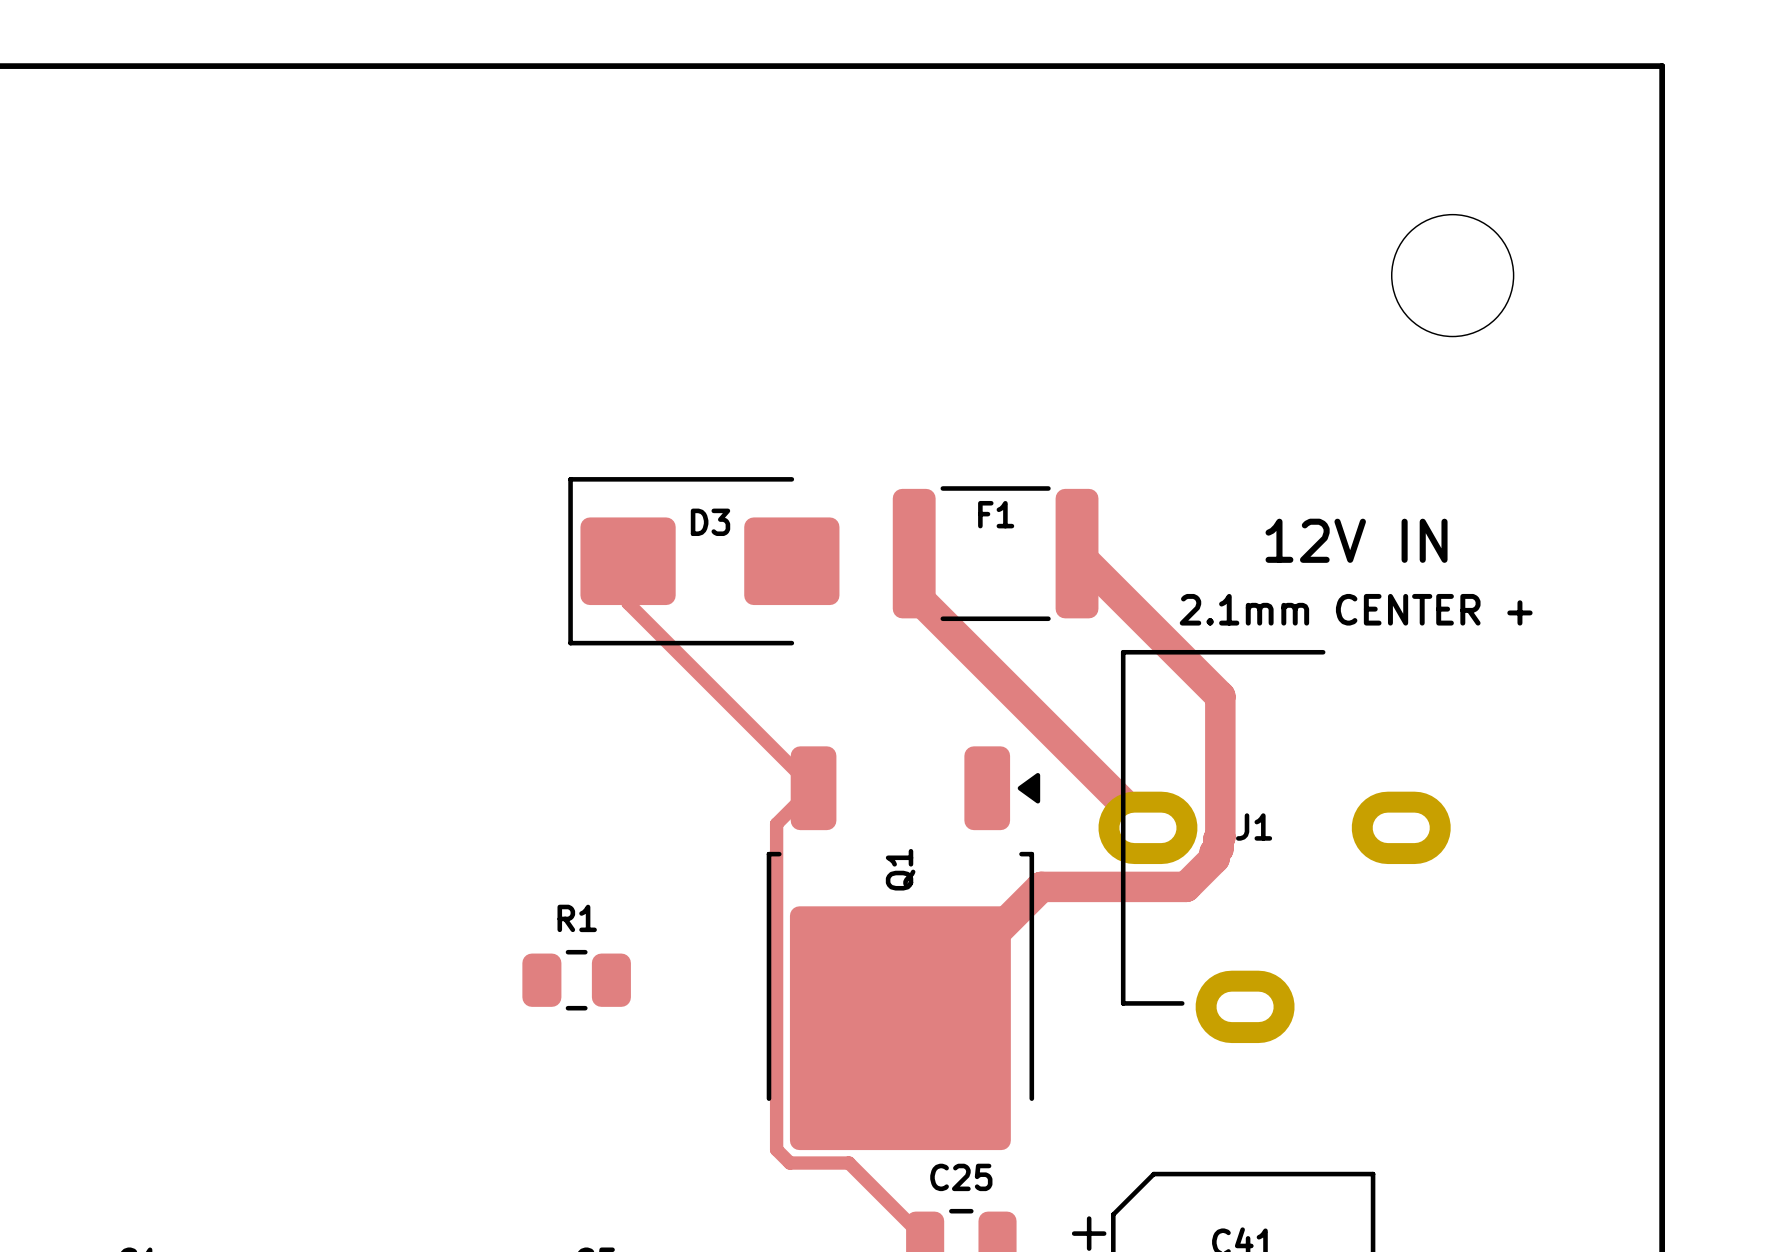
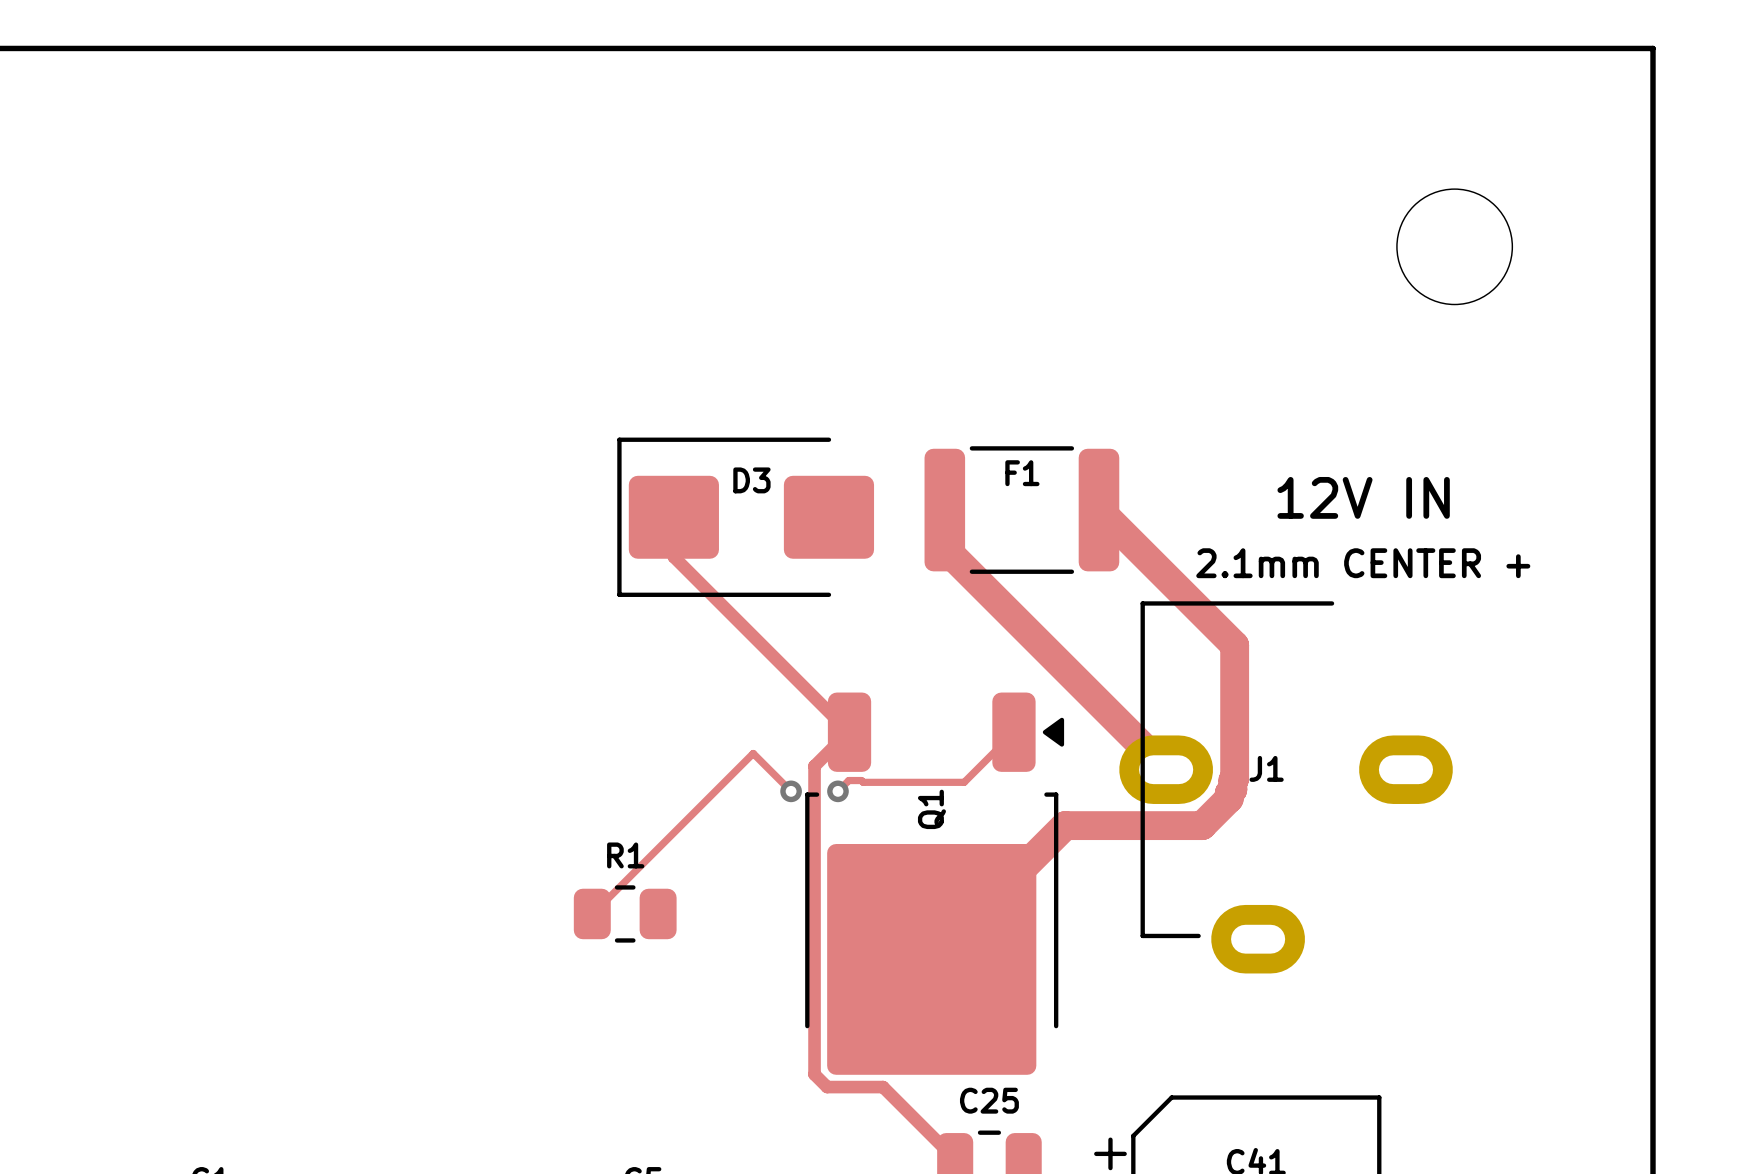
track: none -> (1013, 732) (964, 782) (863, 782) (861, 780) (848, 780) (837, 791)
track: none -> (791, 791) (753, 753) (592, 913)
via: none -> (791, 791)
via: none -> (837, 791)

